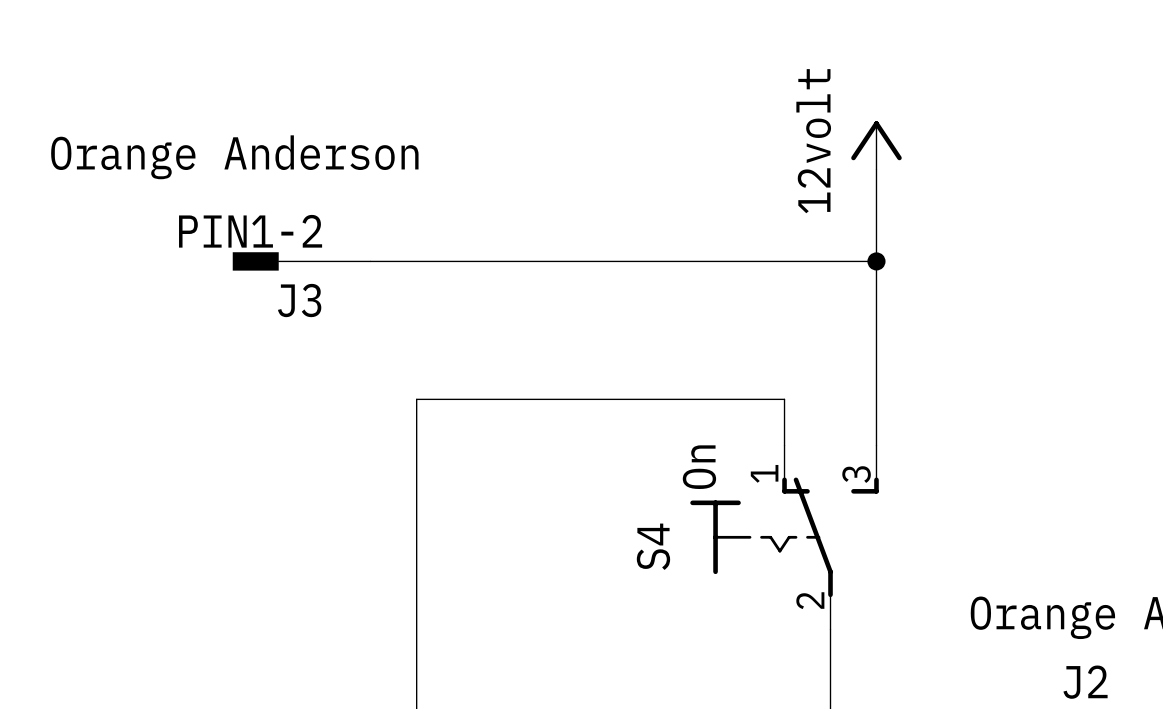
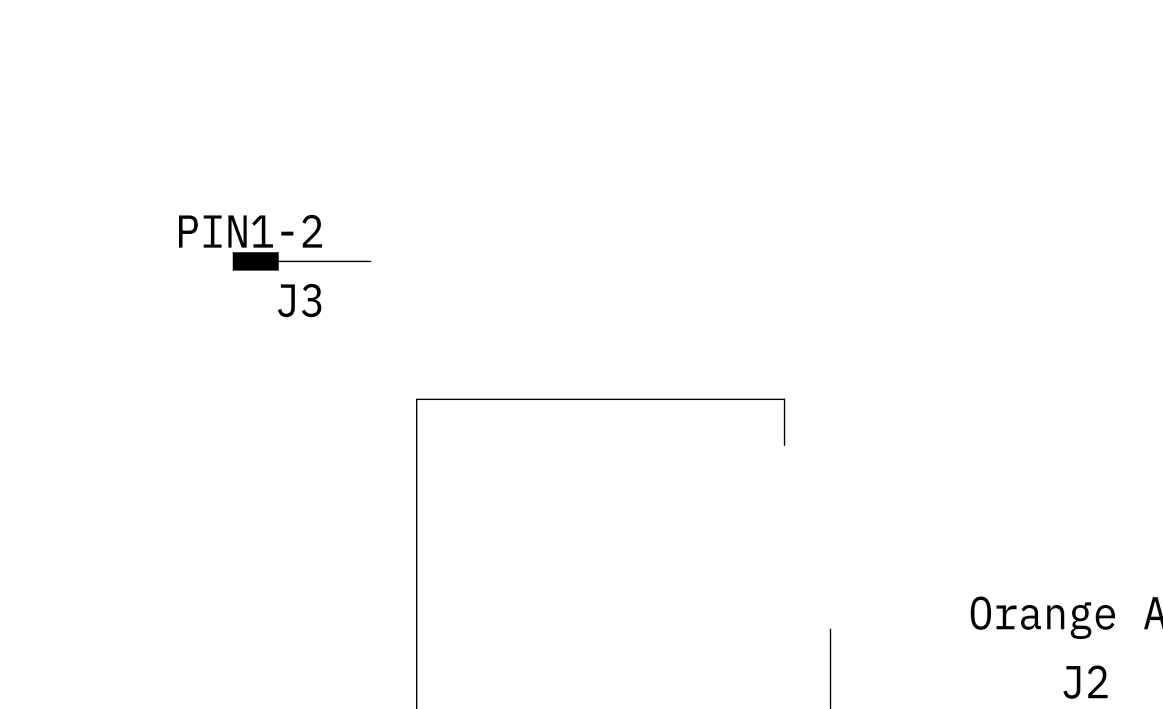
power symbol: 12volt (876, 145) -> none
text: Orange Anderson (234, 157) -> none
wire: (876, 169) (876, 445) -> none
wire: (370, 261) (876, 261) -> none
junction: (876, 261) -> none
S4: On (784, 537) -> none

